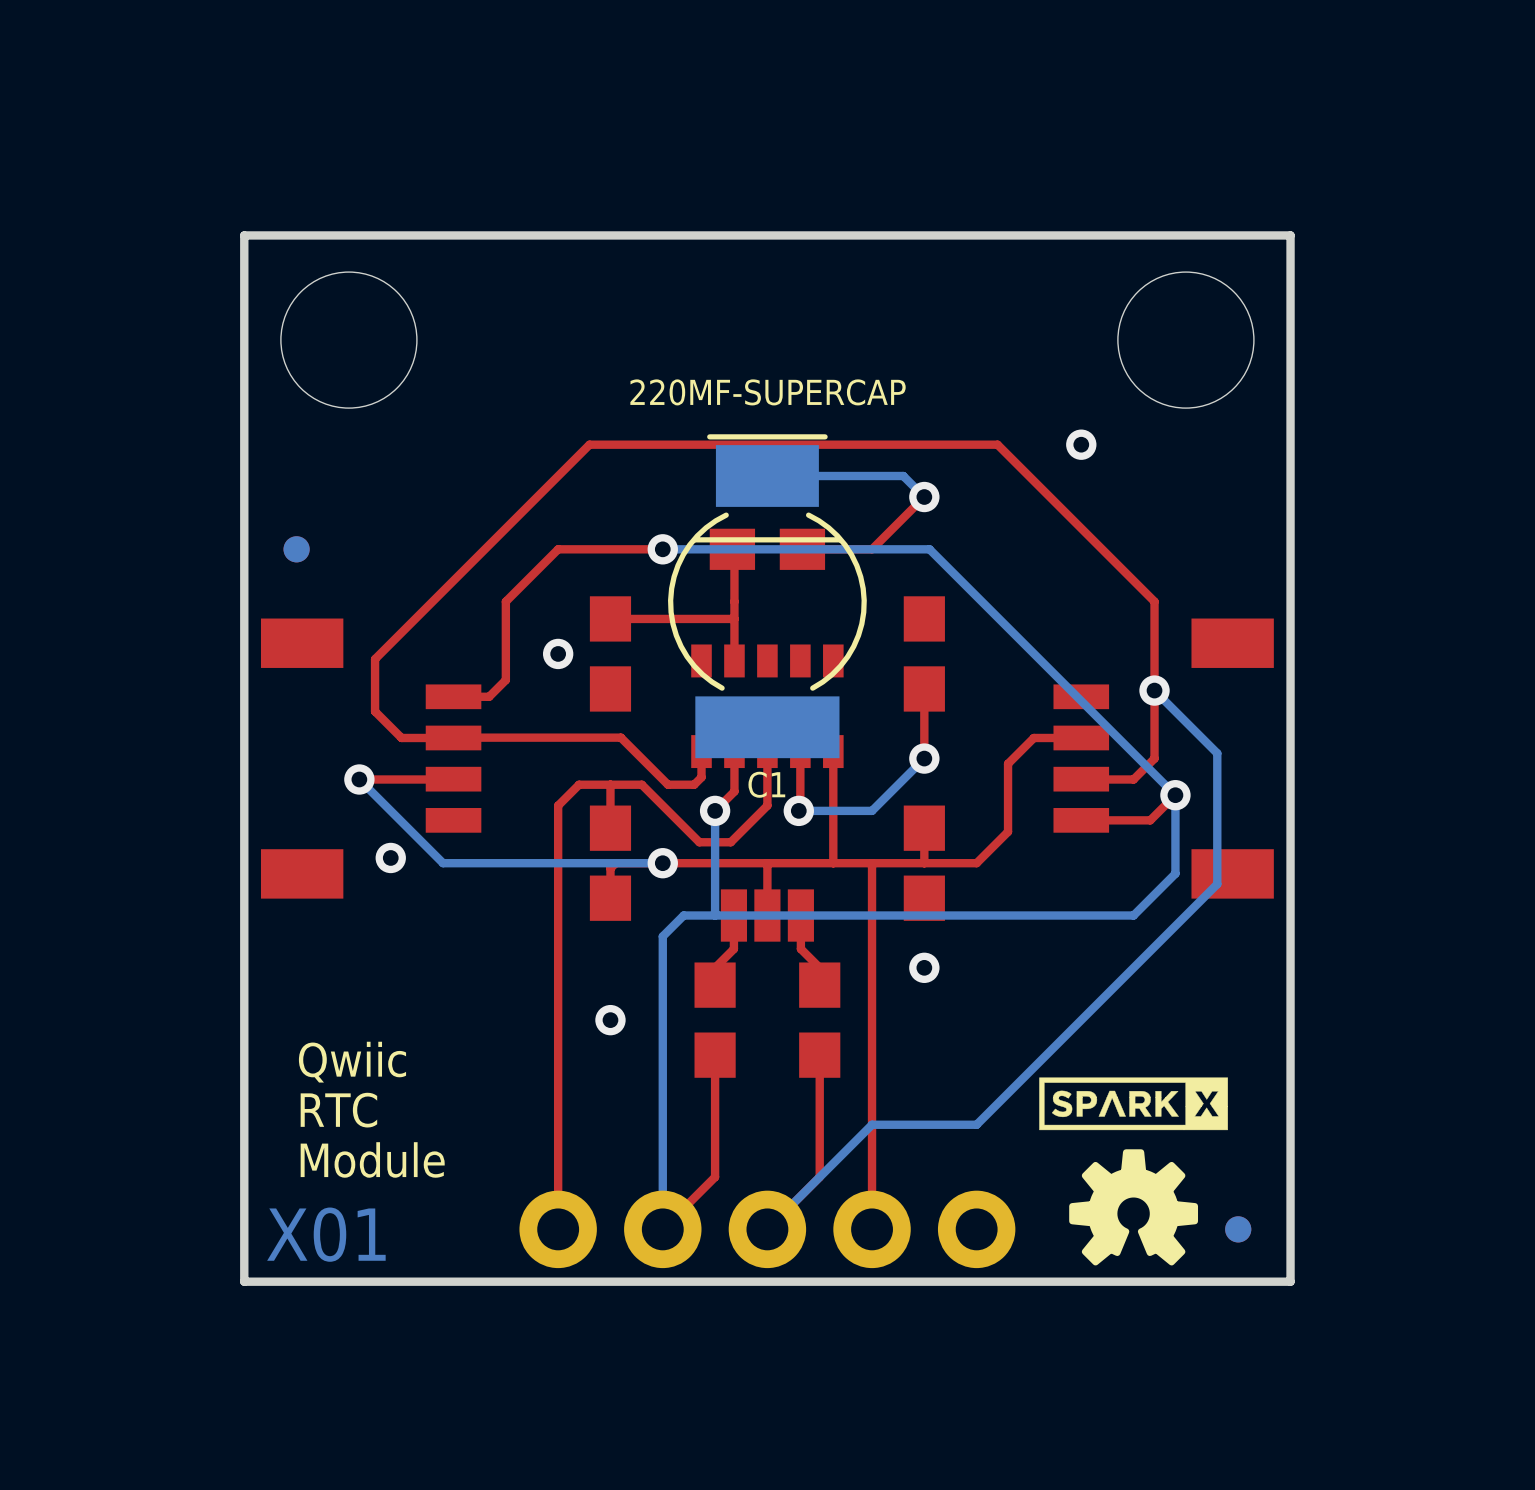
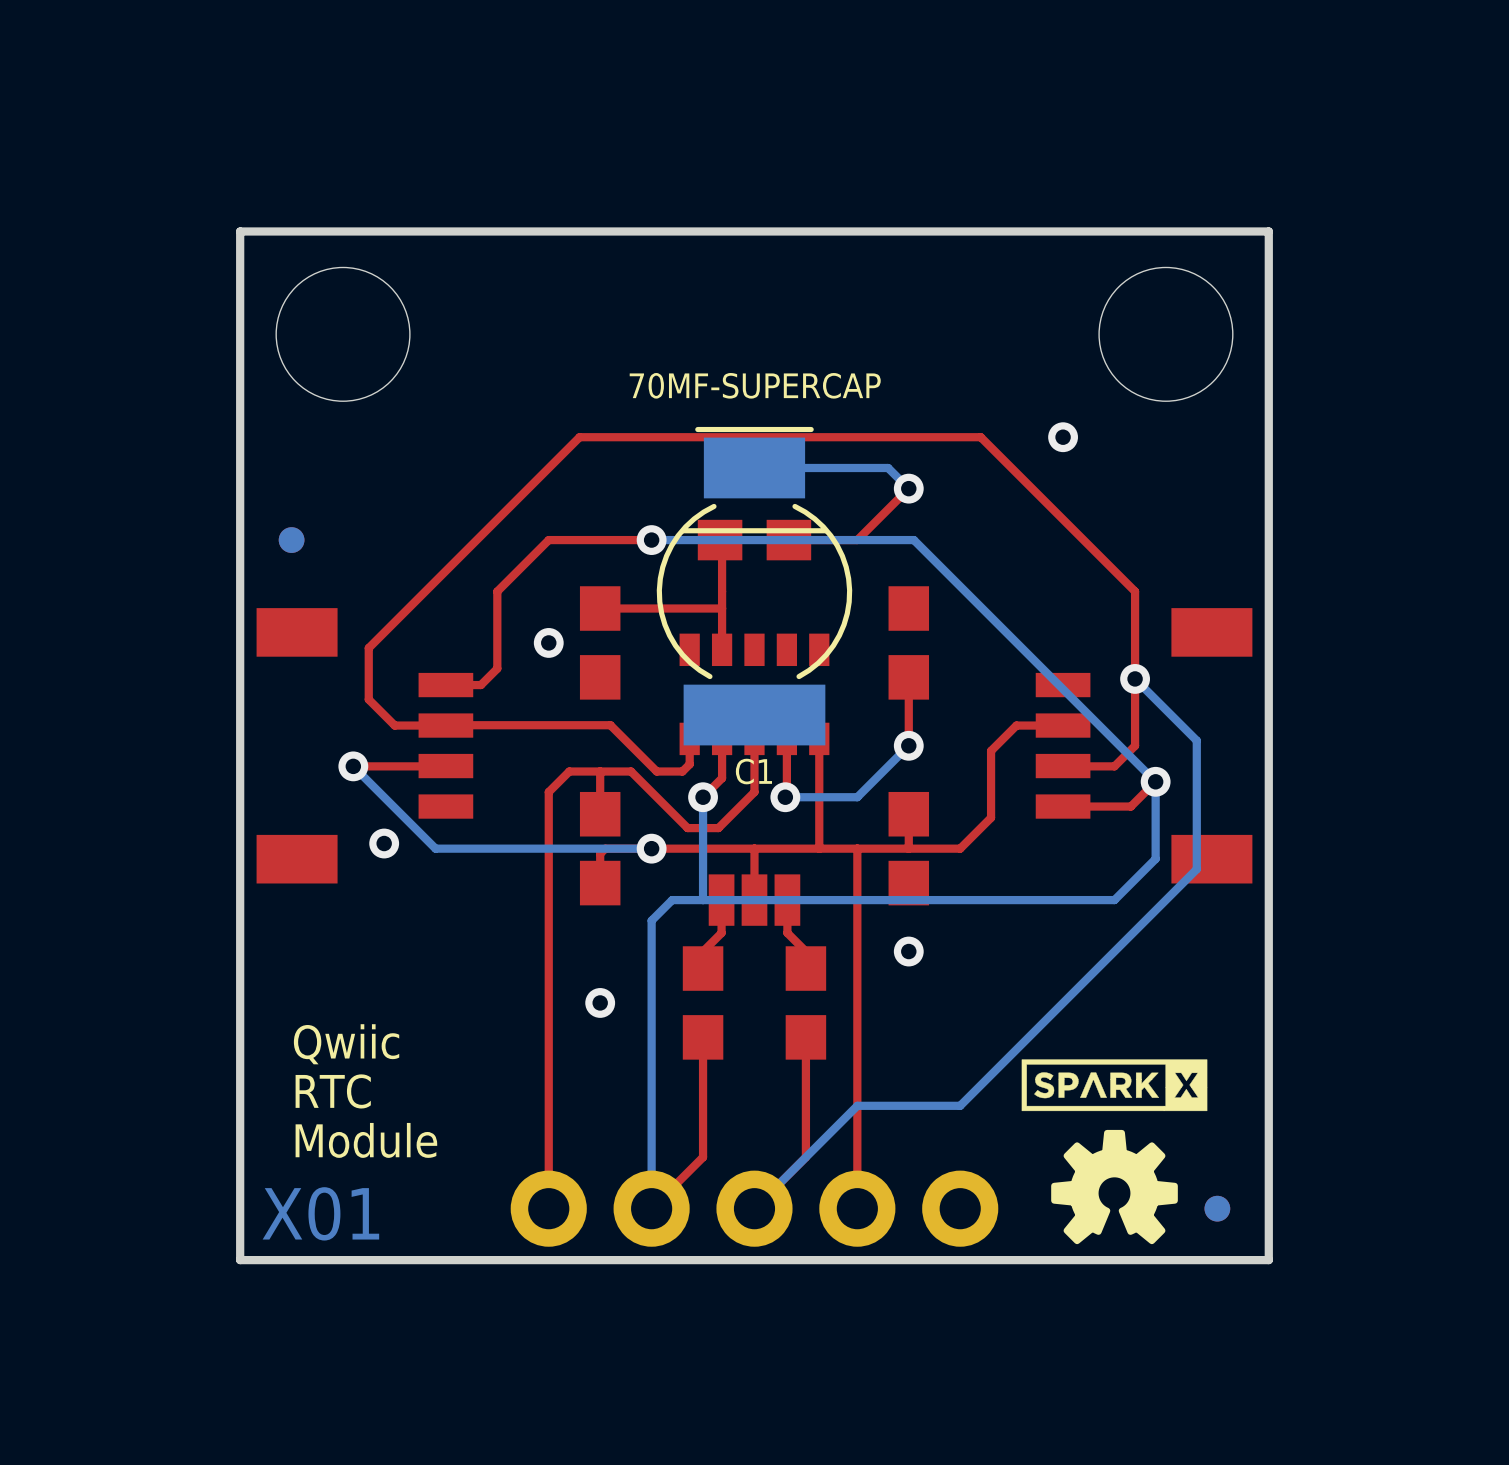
C1 value: 220MF-SUPERCAP (768, 392) -> 70MF-SUPERCAP (755, 385)

